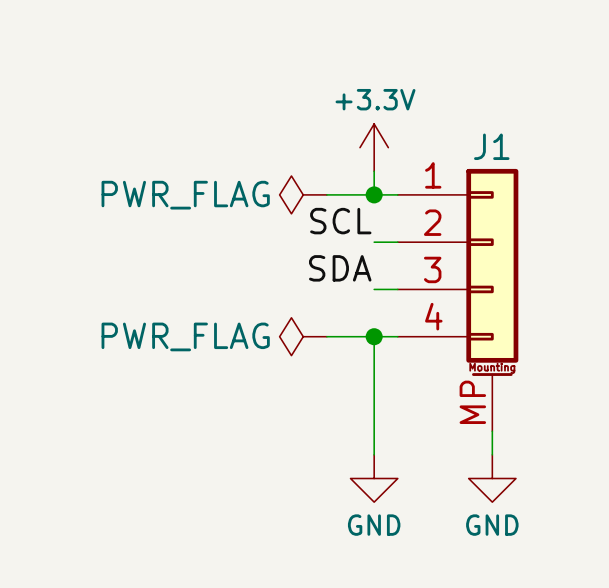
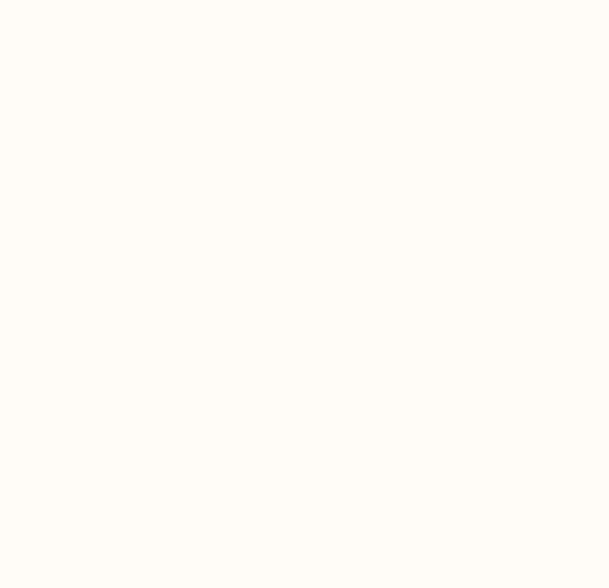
power symbol: +3.3V (374, 147) -> none
wire: (374, 171) (374, 194) -> none
power symbol: PWR_FLAG (303, 194) -> none
wire: (326, 194) (397, 194) -> none
junction: (374, 194) -> none
label: SCL (340, 221) -> none
wire: (374, 242) (397, 242) -> none
label: SDA (340, 268) -> none
wire: (374, 289) (397, 289) -> none
J1: (458, 300) -> none
power symbol: PWR_FLAG (303, 336) -> none
wire: (326, 336) (397, 336) -> none
wire: (374, 336) (374, 454) -> none
junction: (374, 336) -> none
wire: (492, 431) (492, 454) -> none
power symbol: GND (374, 478) -> none
power symbol: GND (492, 478) -> none

